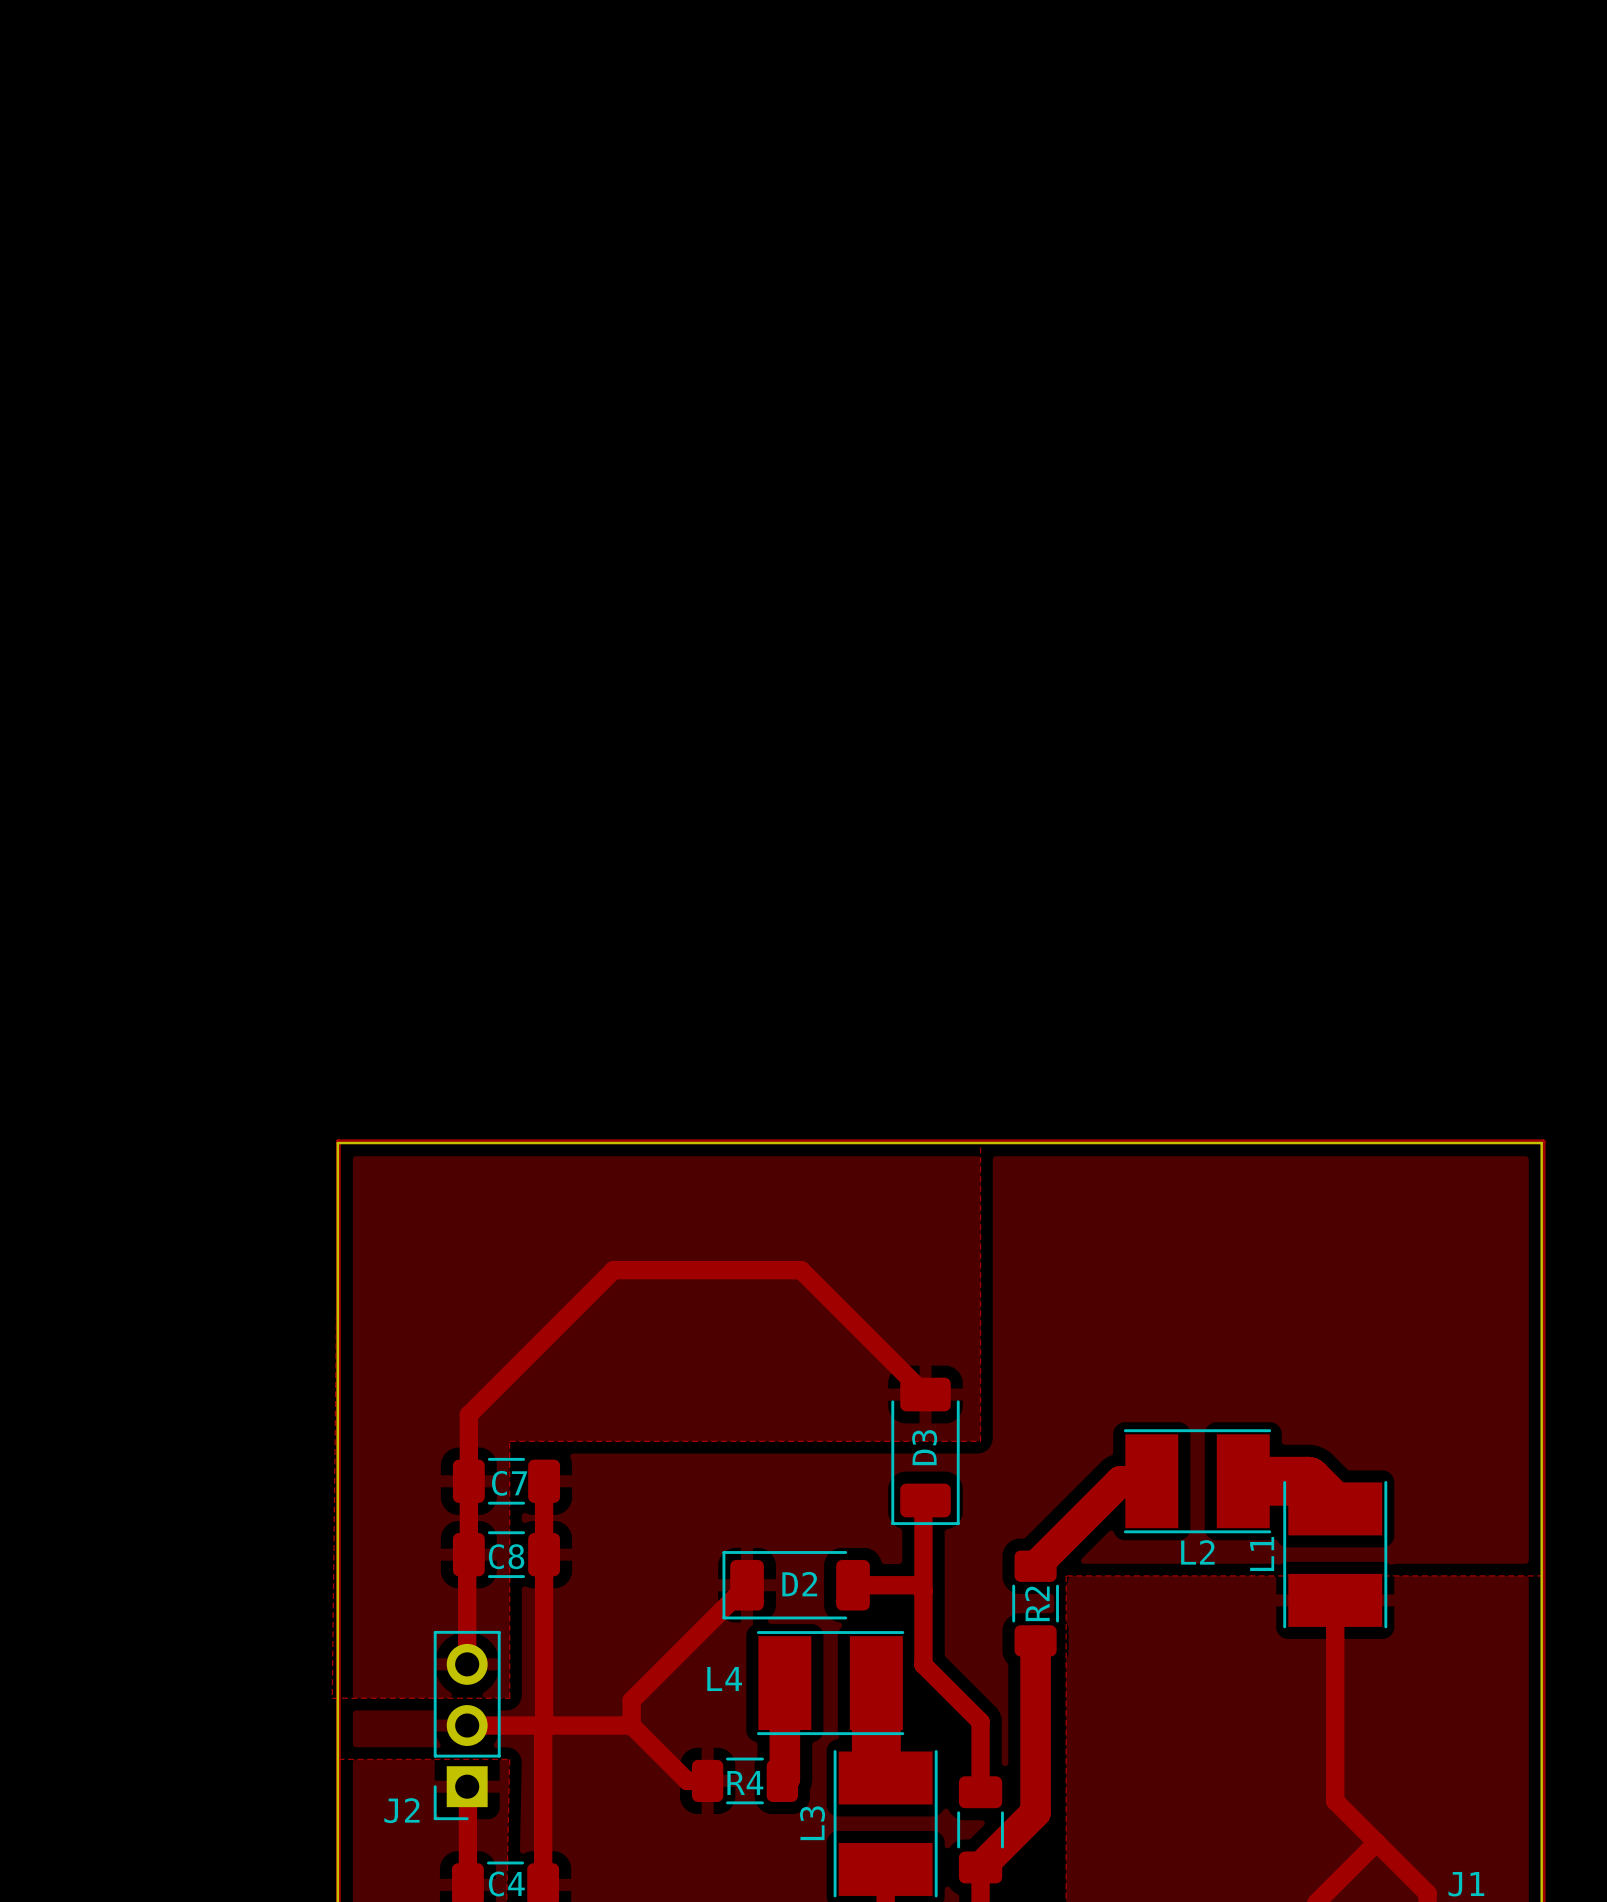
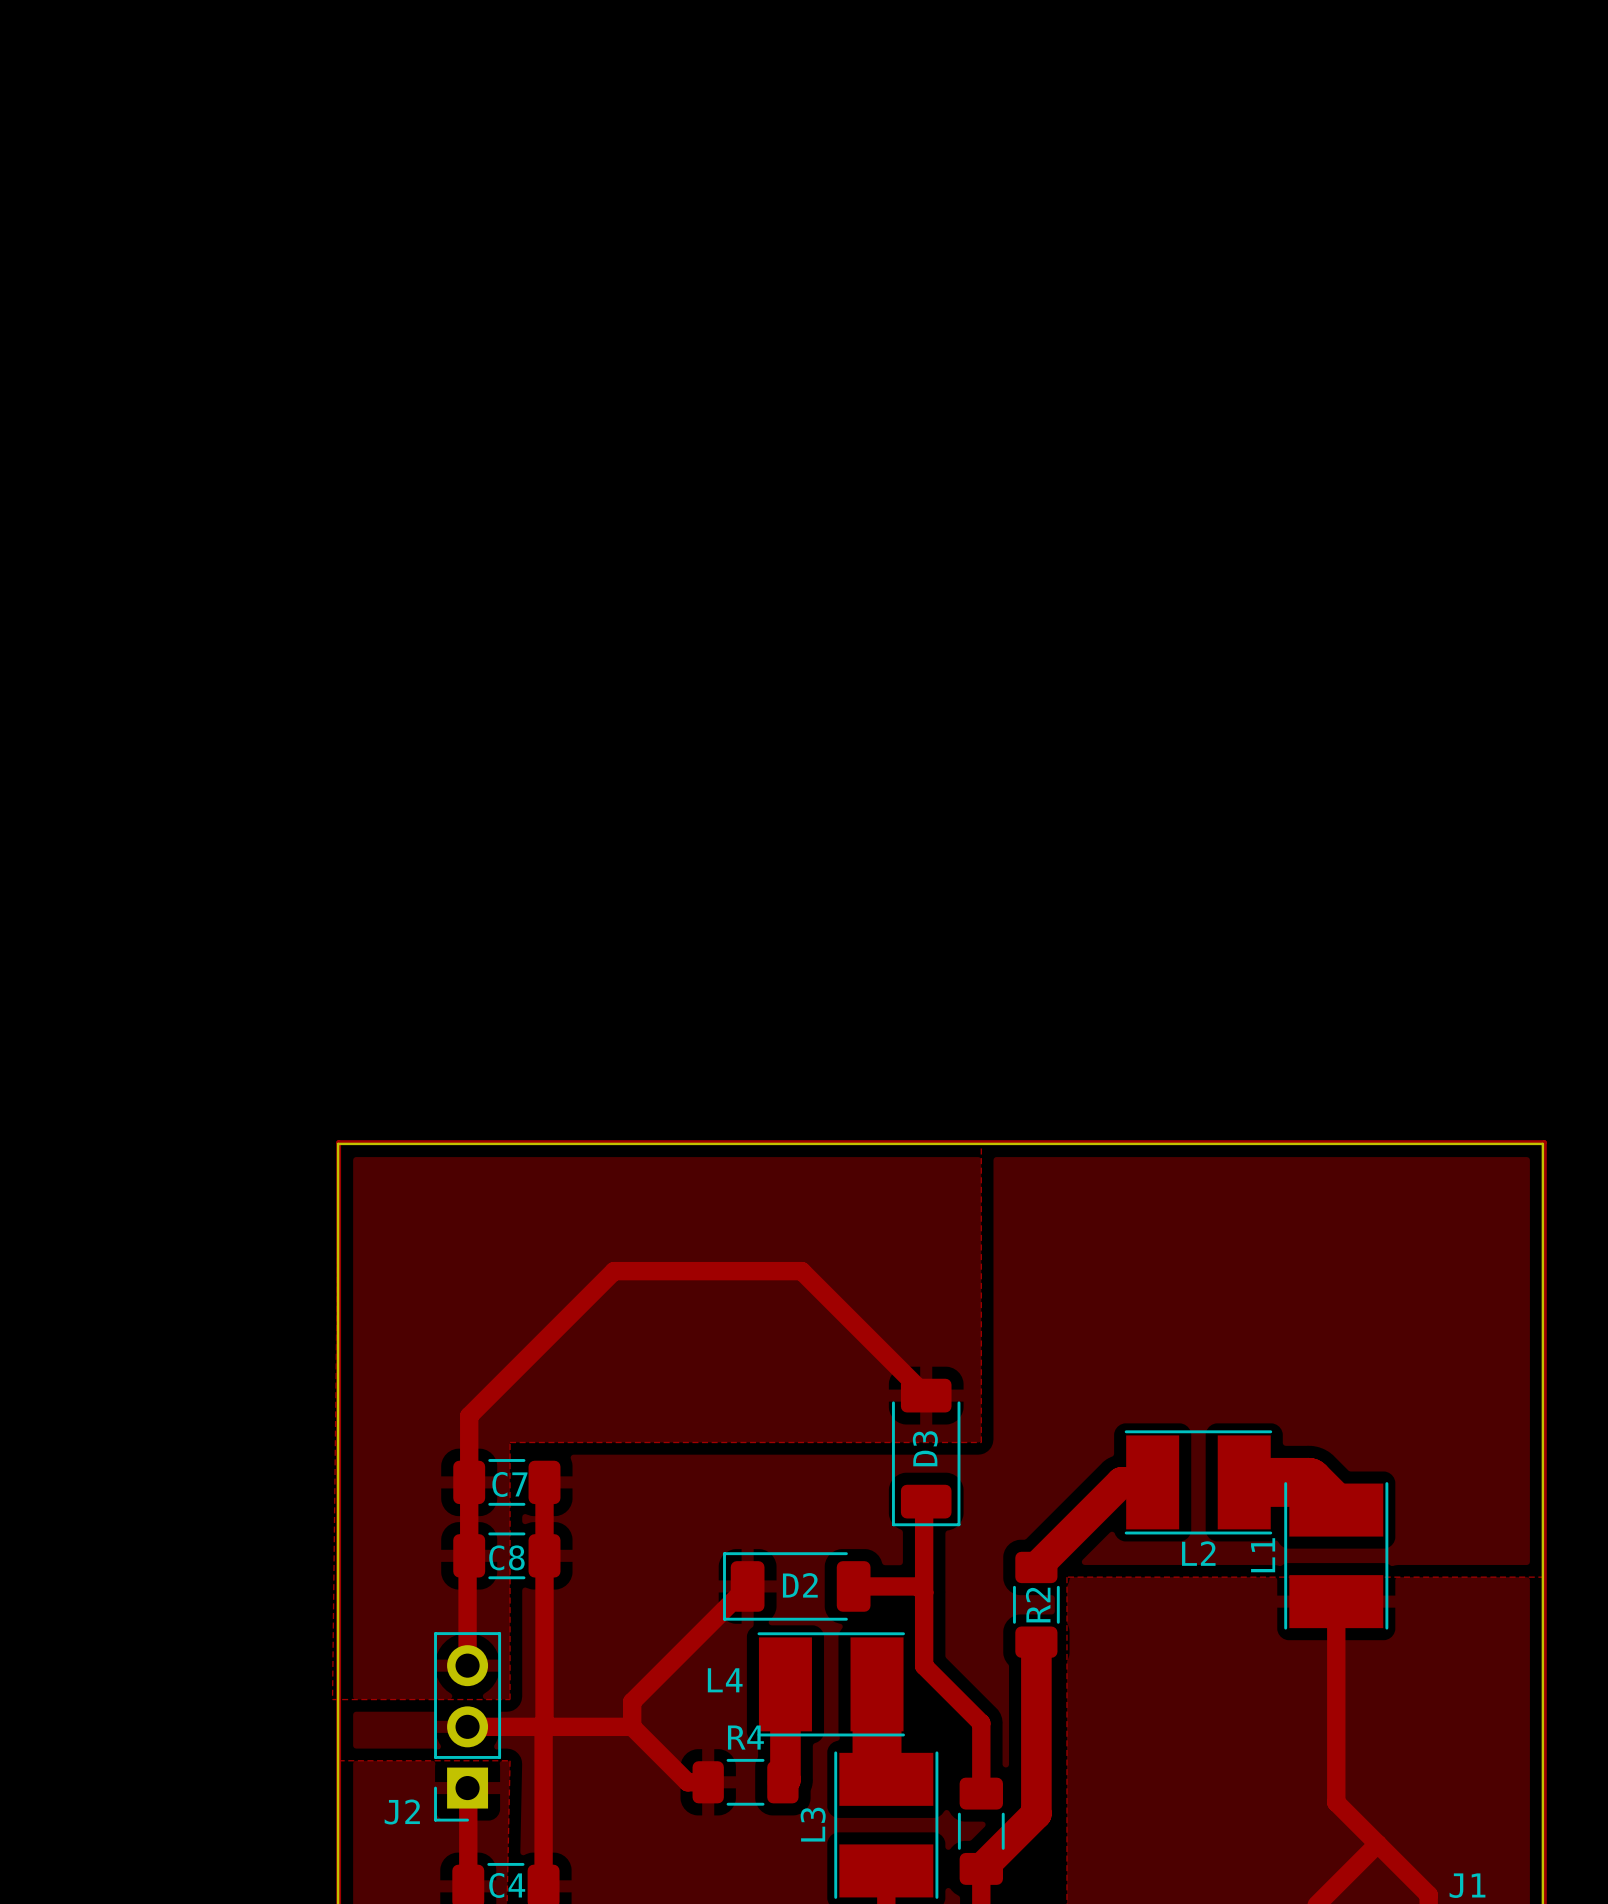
R4 name position: R4 (745, 1782) -> R4 (745, 1737)

